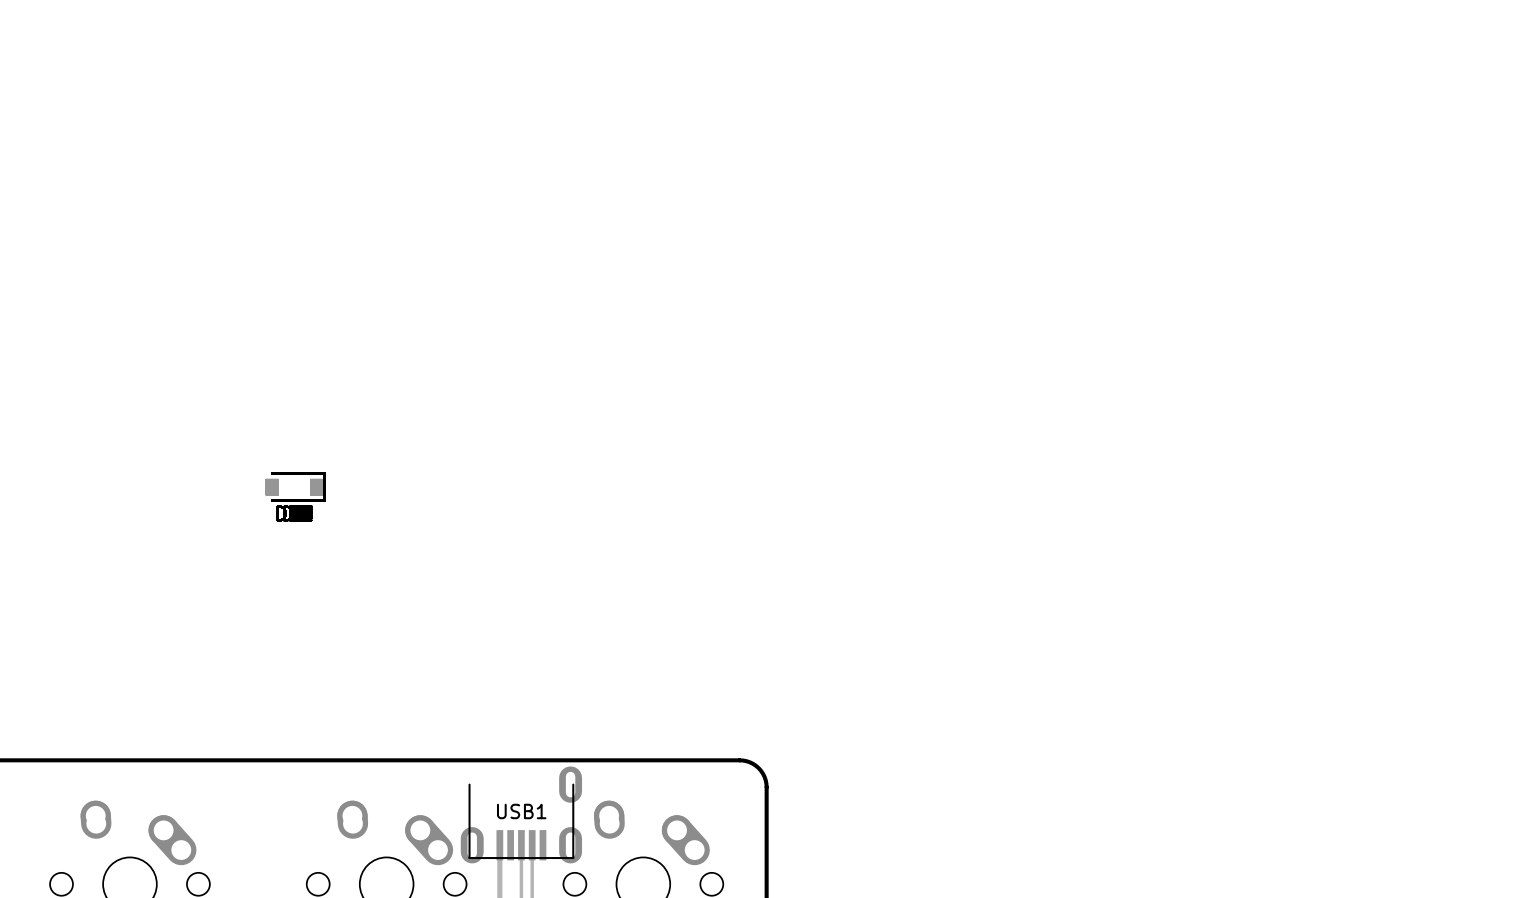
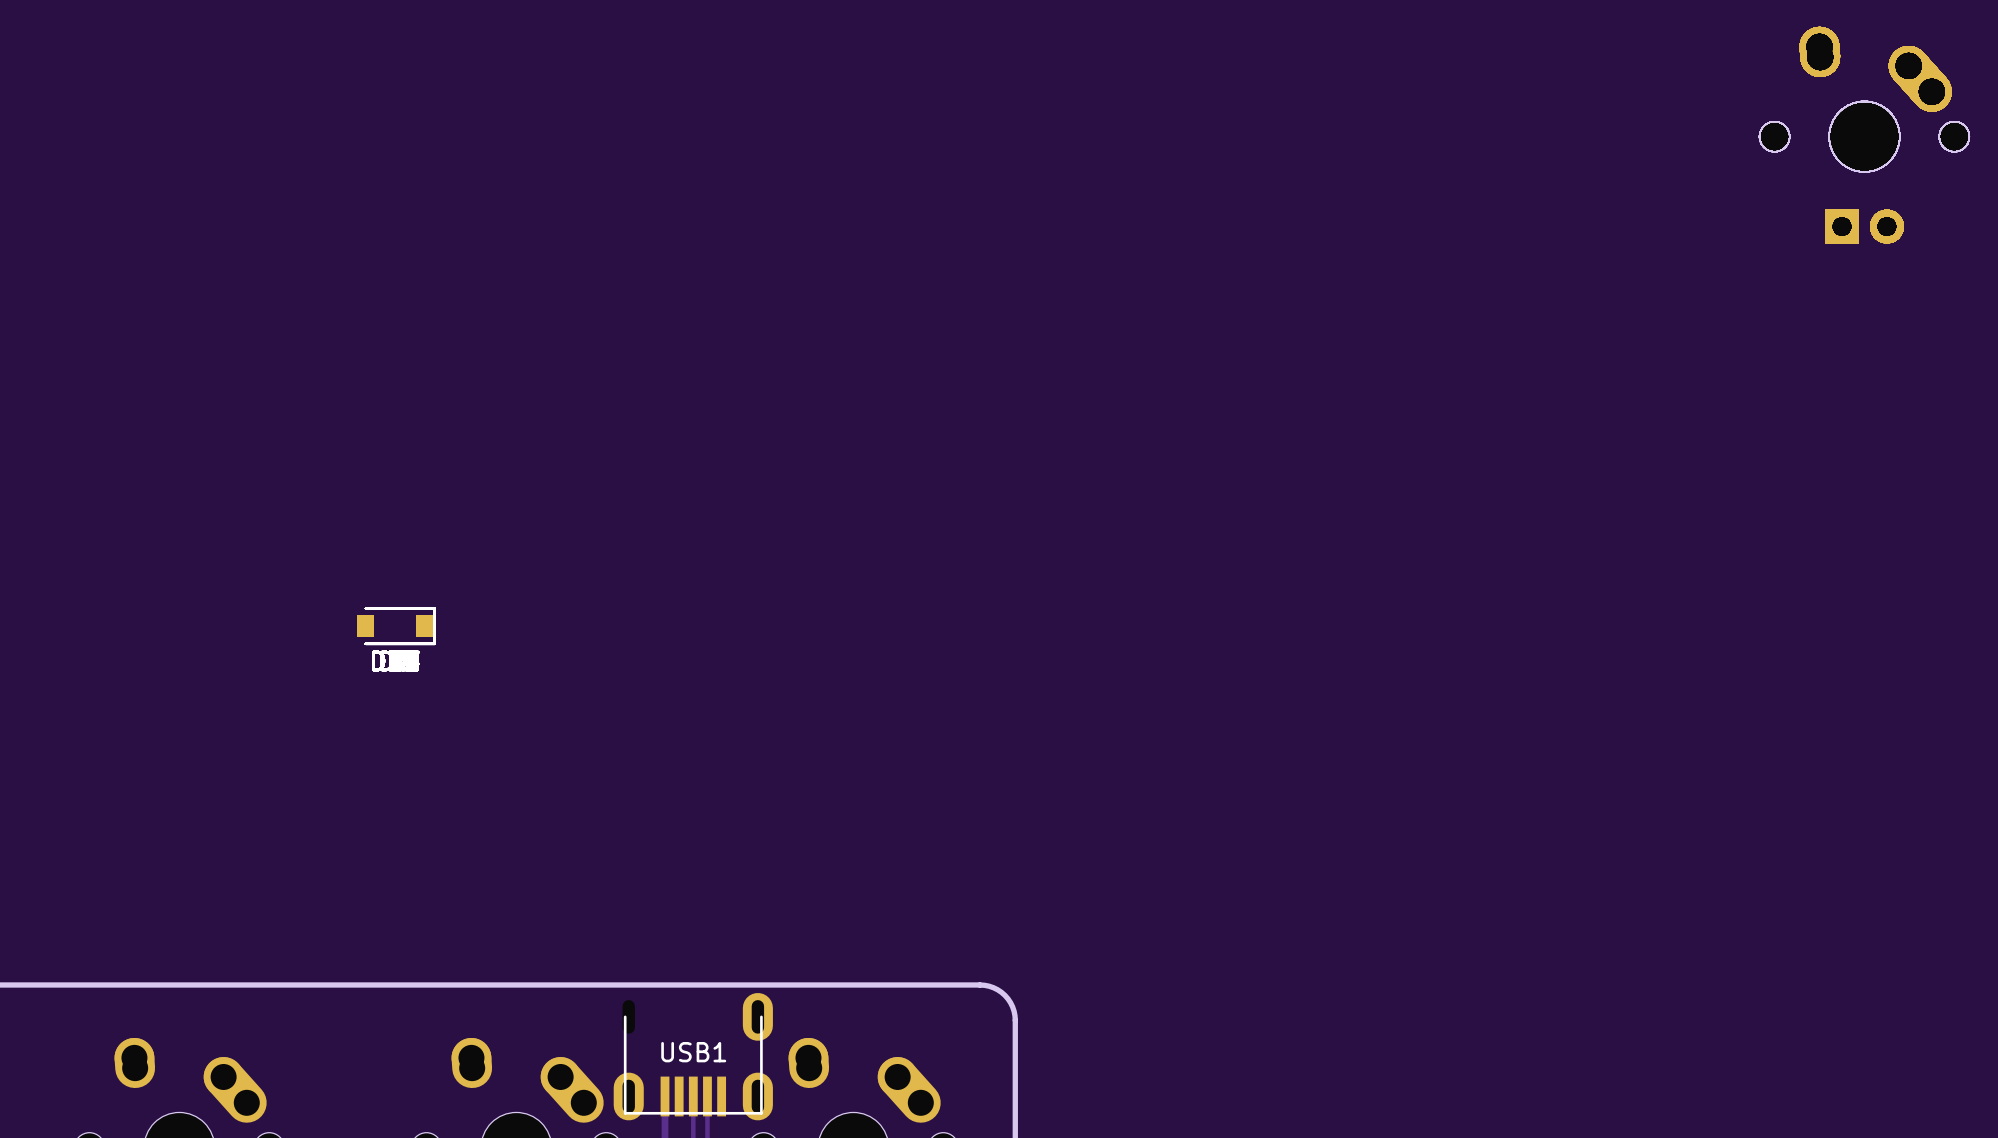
part: none -> (1864, 135)

